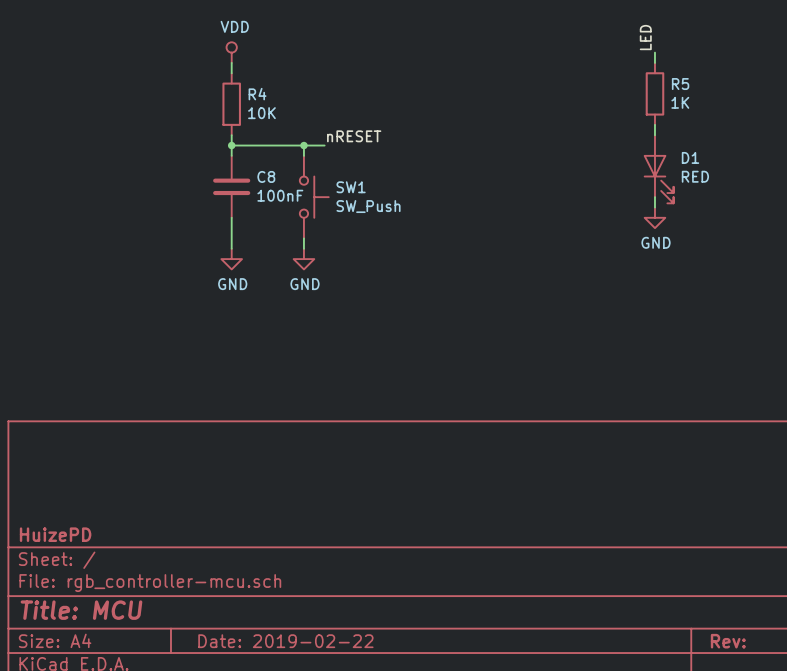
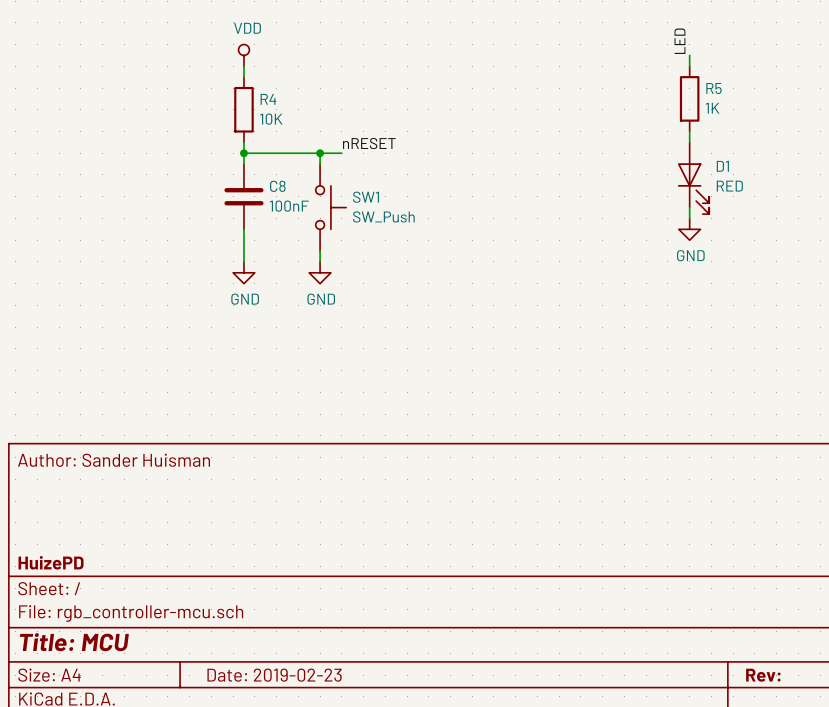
title block: none -> Author: Sander Huisman (114, 460)
title block: Date: 2019-02-22 (285, 641) -> Date: 2019-02-23 (274, 675)

